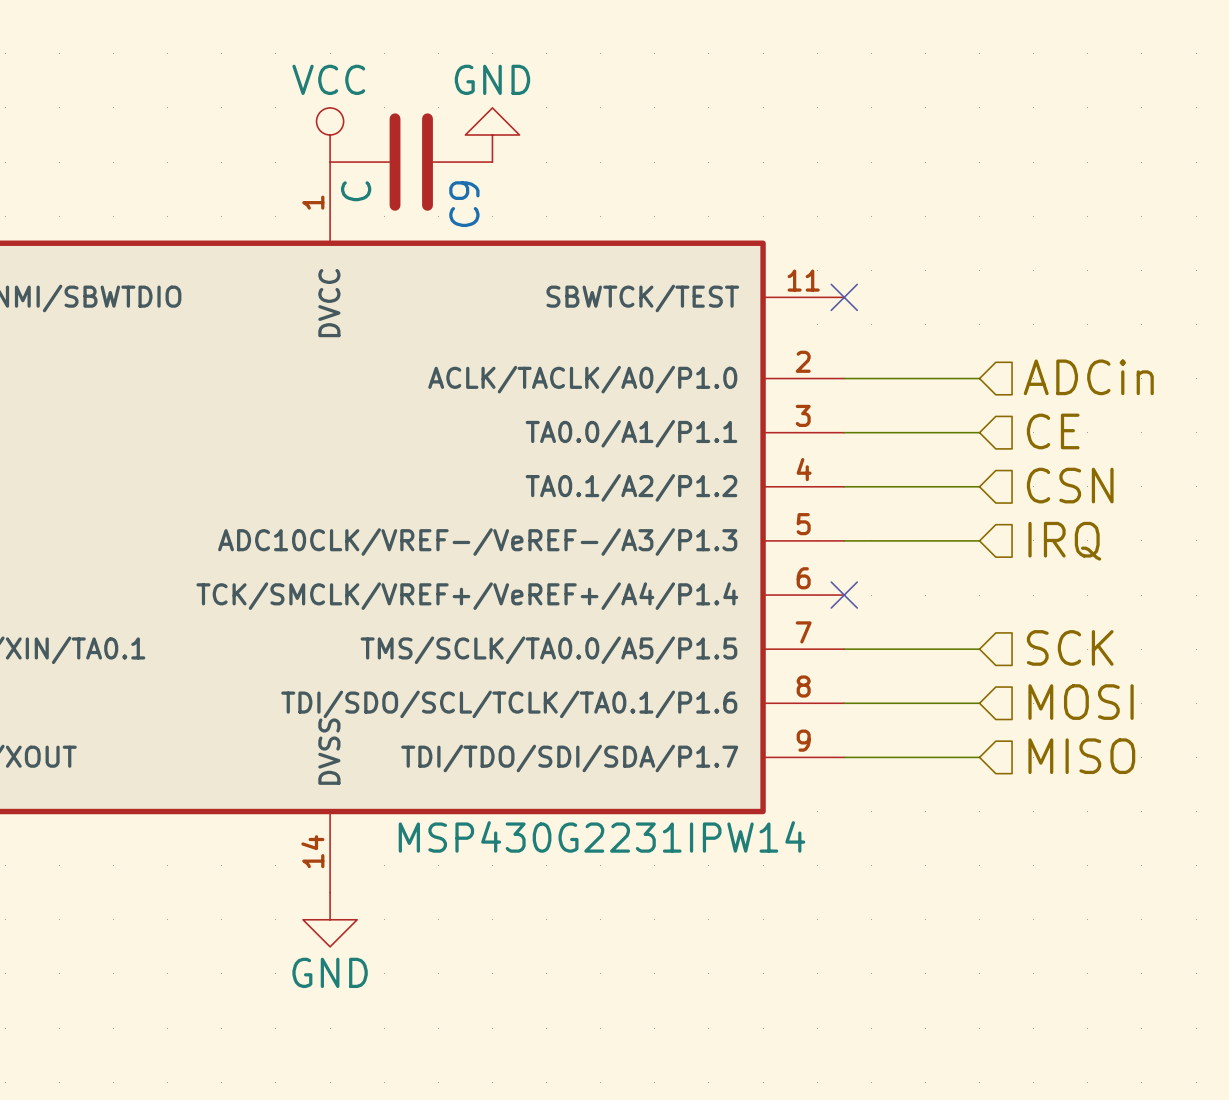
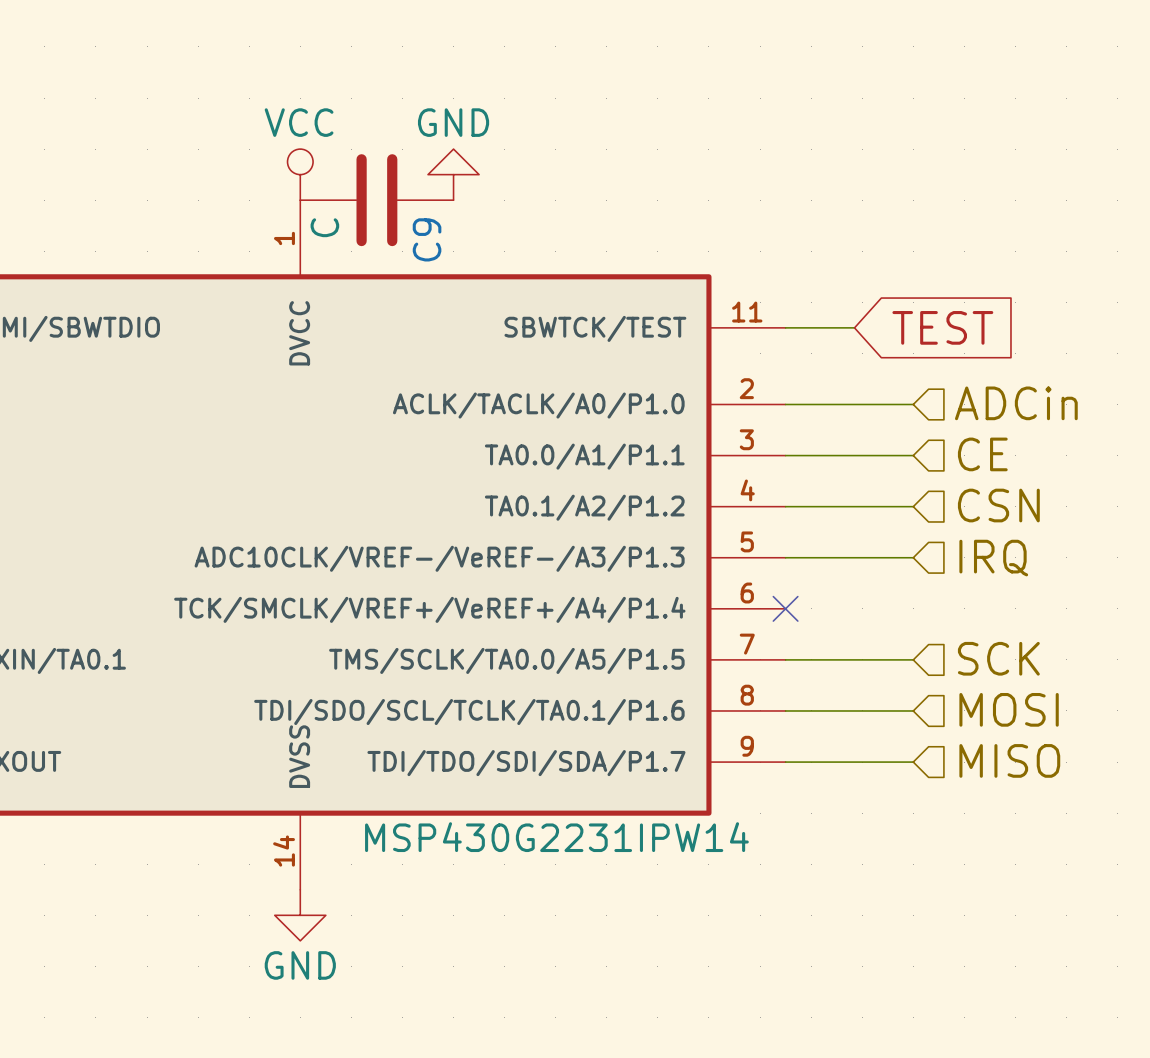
wire: none -> (785, 327) (854, 327)
no-connect mark: (844, 297) -> none
global label: none -> TEST (942, 327)

